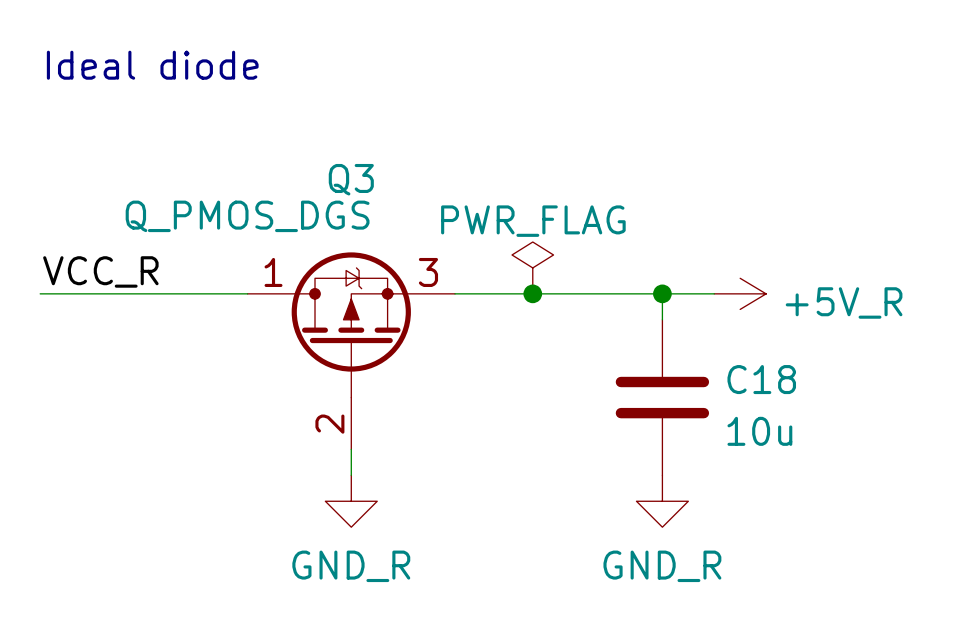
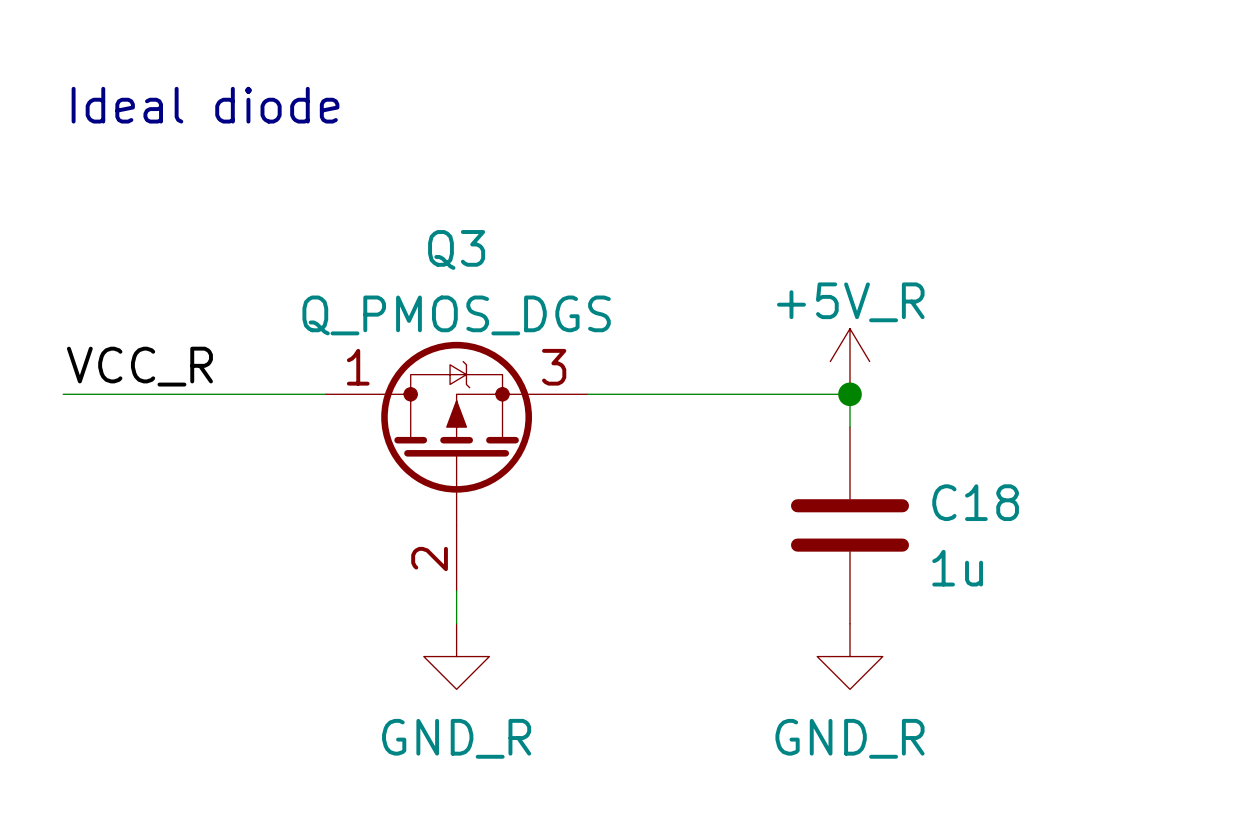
Q3 value position: Q_PMOS_DGS (247, 216) -> Q_PMOS_DGS (456, 315)
power symbol: PWR_FLAG (532, 267) -> none
junction: (532, 293) -> none
wire: (662, 293) (714, 293) -> none
power symbol rotation: 0° (740, 293) -> 90° counterclockwise (850, 361)
power symbol position: +5V_R (740, 293) -> +5V_R (850, 361)
power symbol text position: +5V_R (844, 302) -> +5V_R (850, 302)
C18 value: 10u (759, 431) -> 1u (957, 568)

